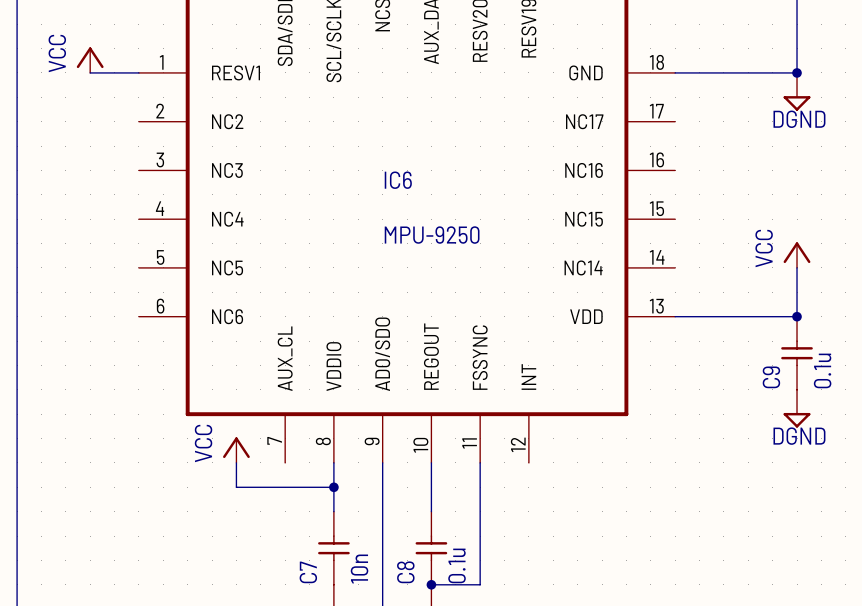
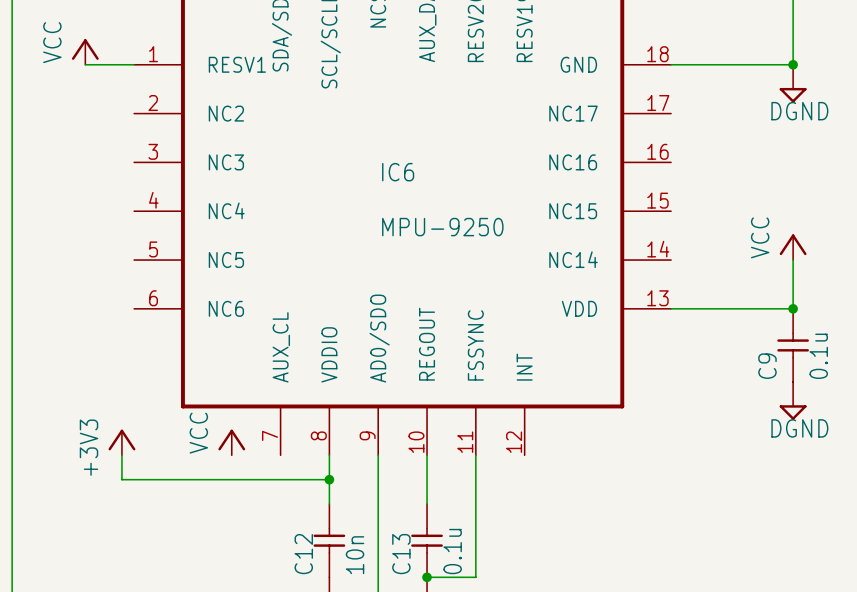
power symbol: none -> +3V3 (121, 442)
wire: (236, 462) (236, 487) -> (121, 455) (121, 479) (231, 479)
C7 name: C7 (308, 572) -> C12 (303, 554)
C8 name: C8 (405, 572) -> C13 (401, 554)

